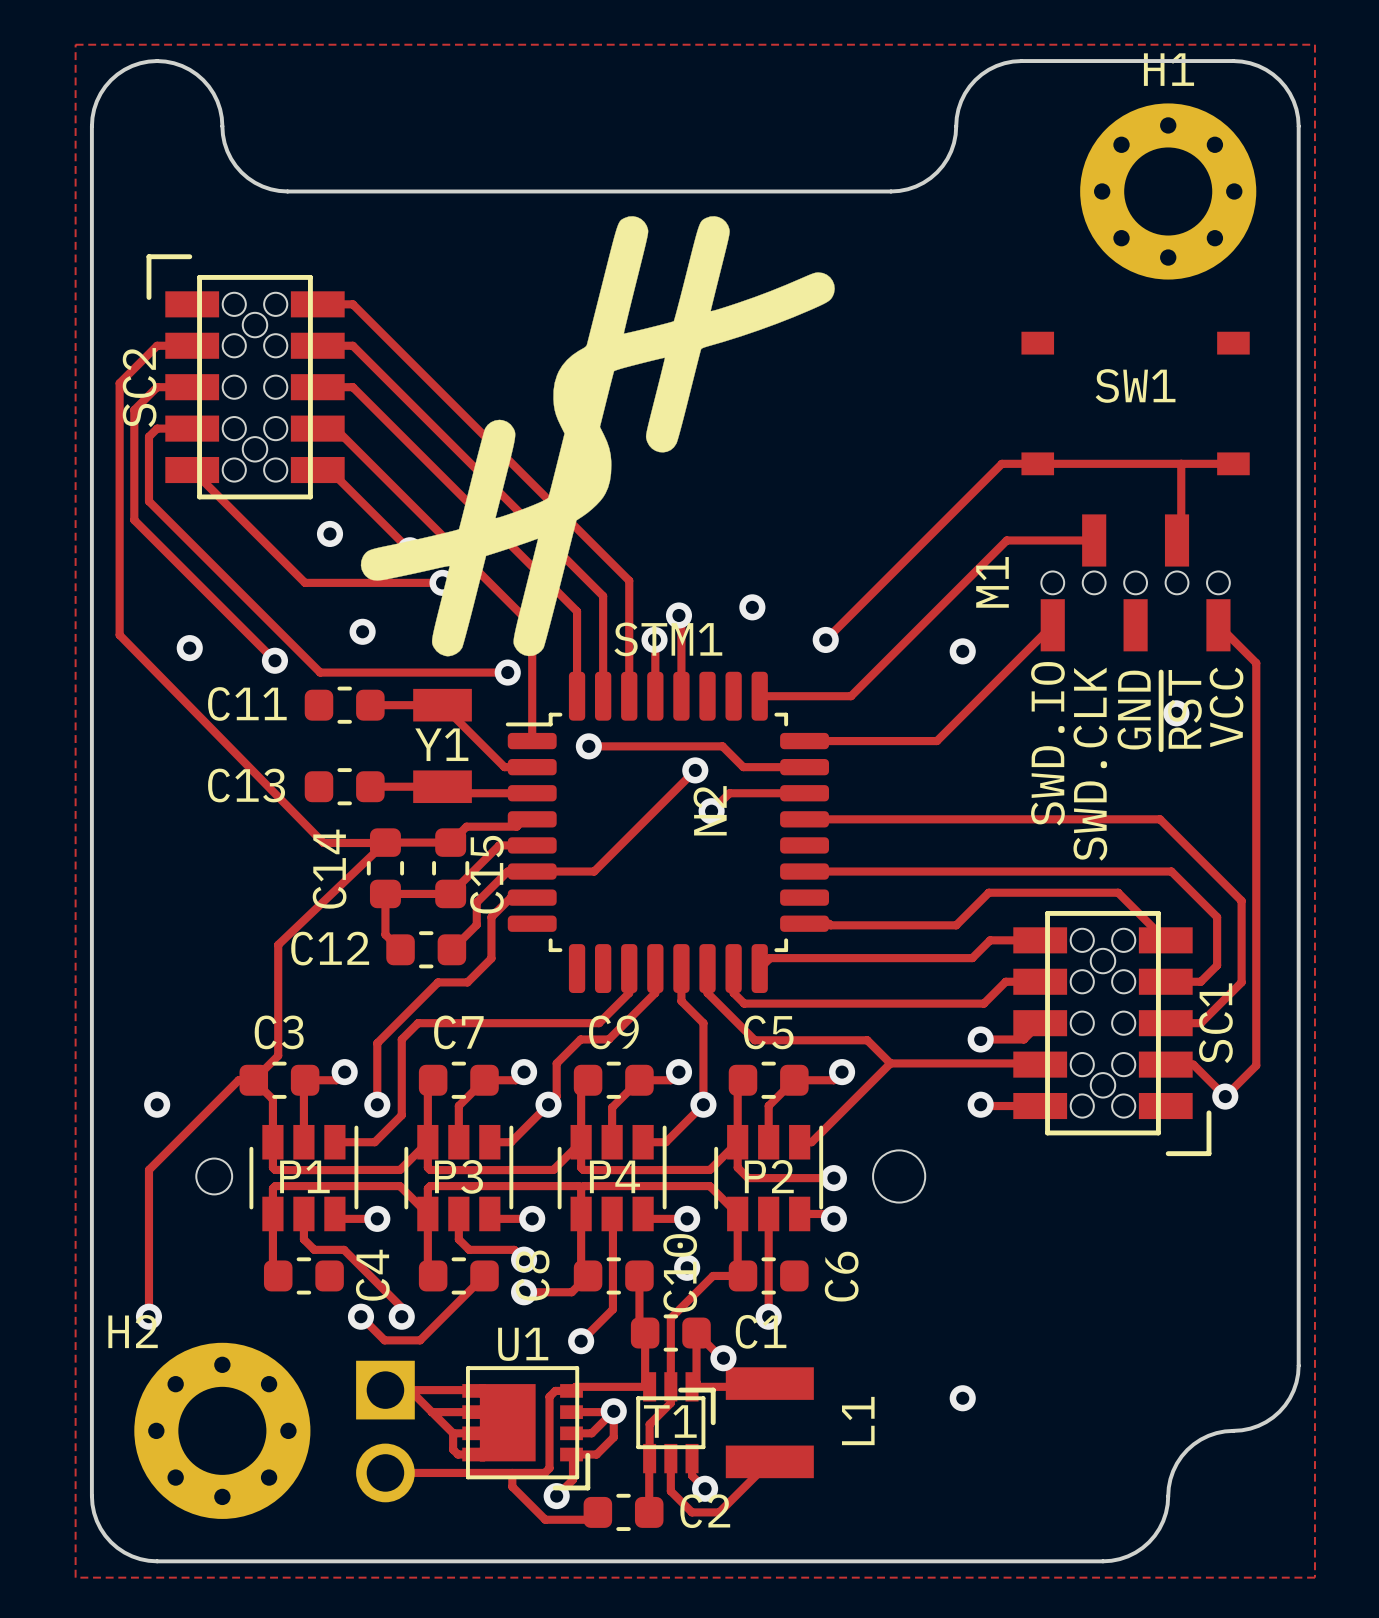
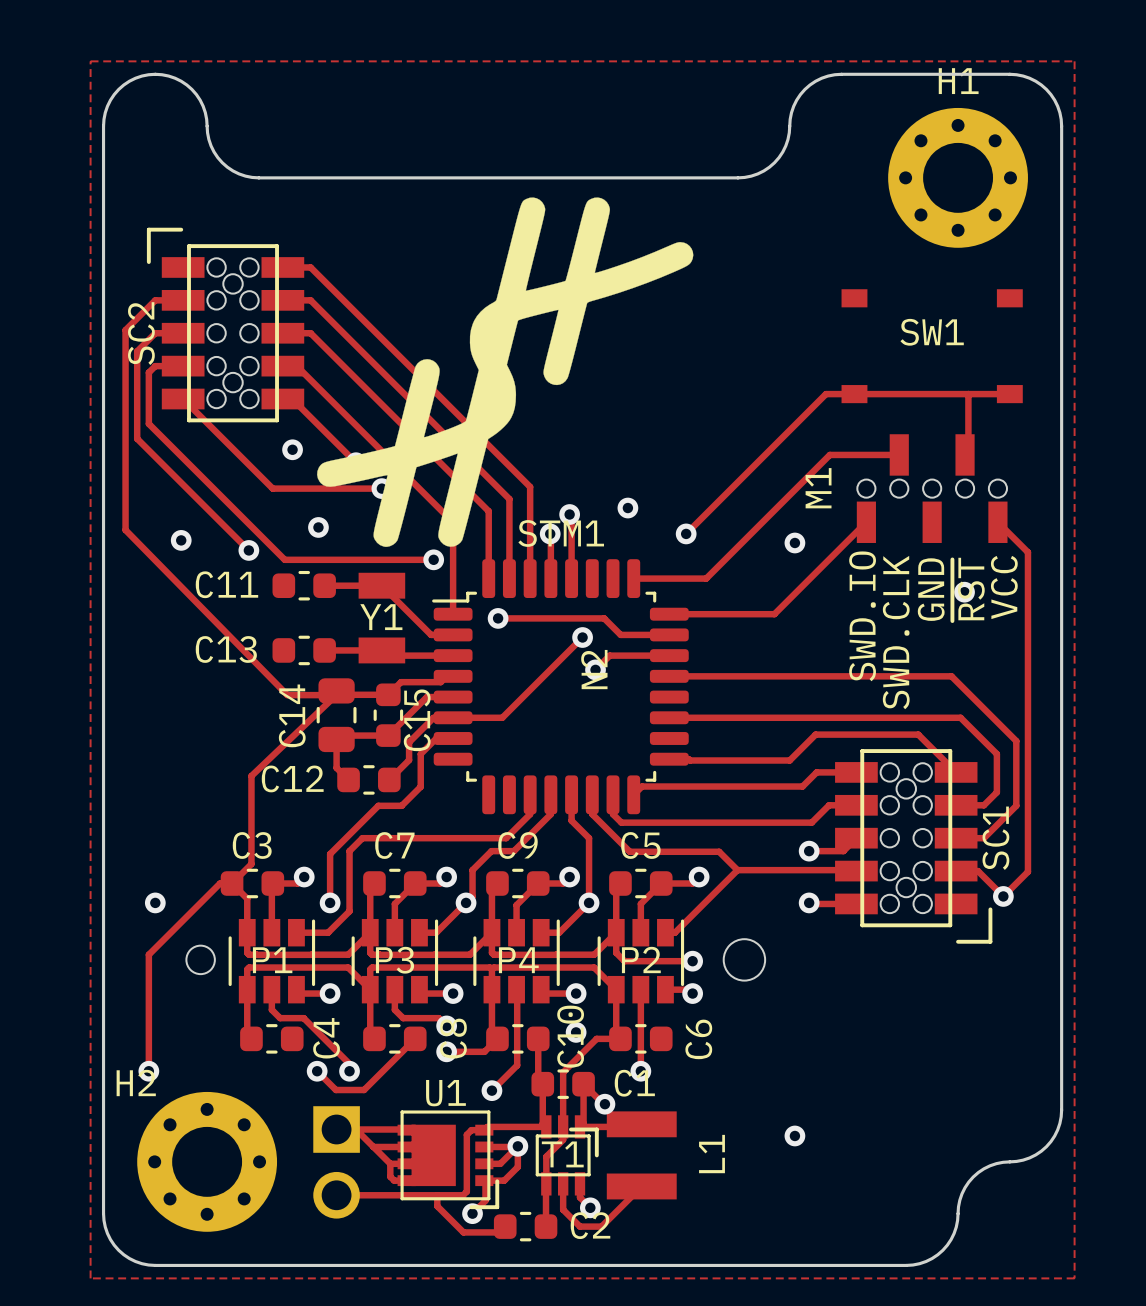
C14 footprint: [366, 828, 405, 909] -> [316, 678, 357, 753]

